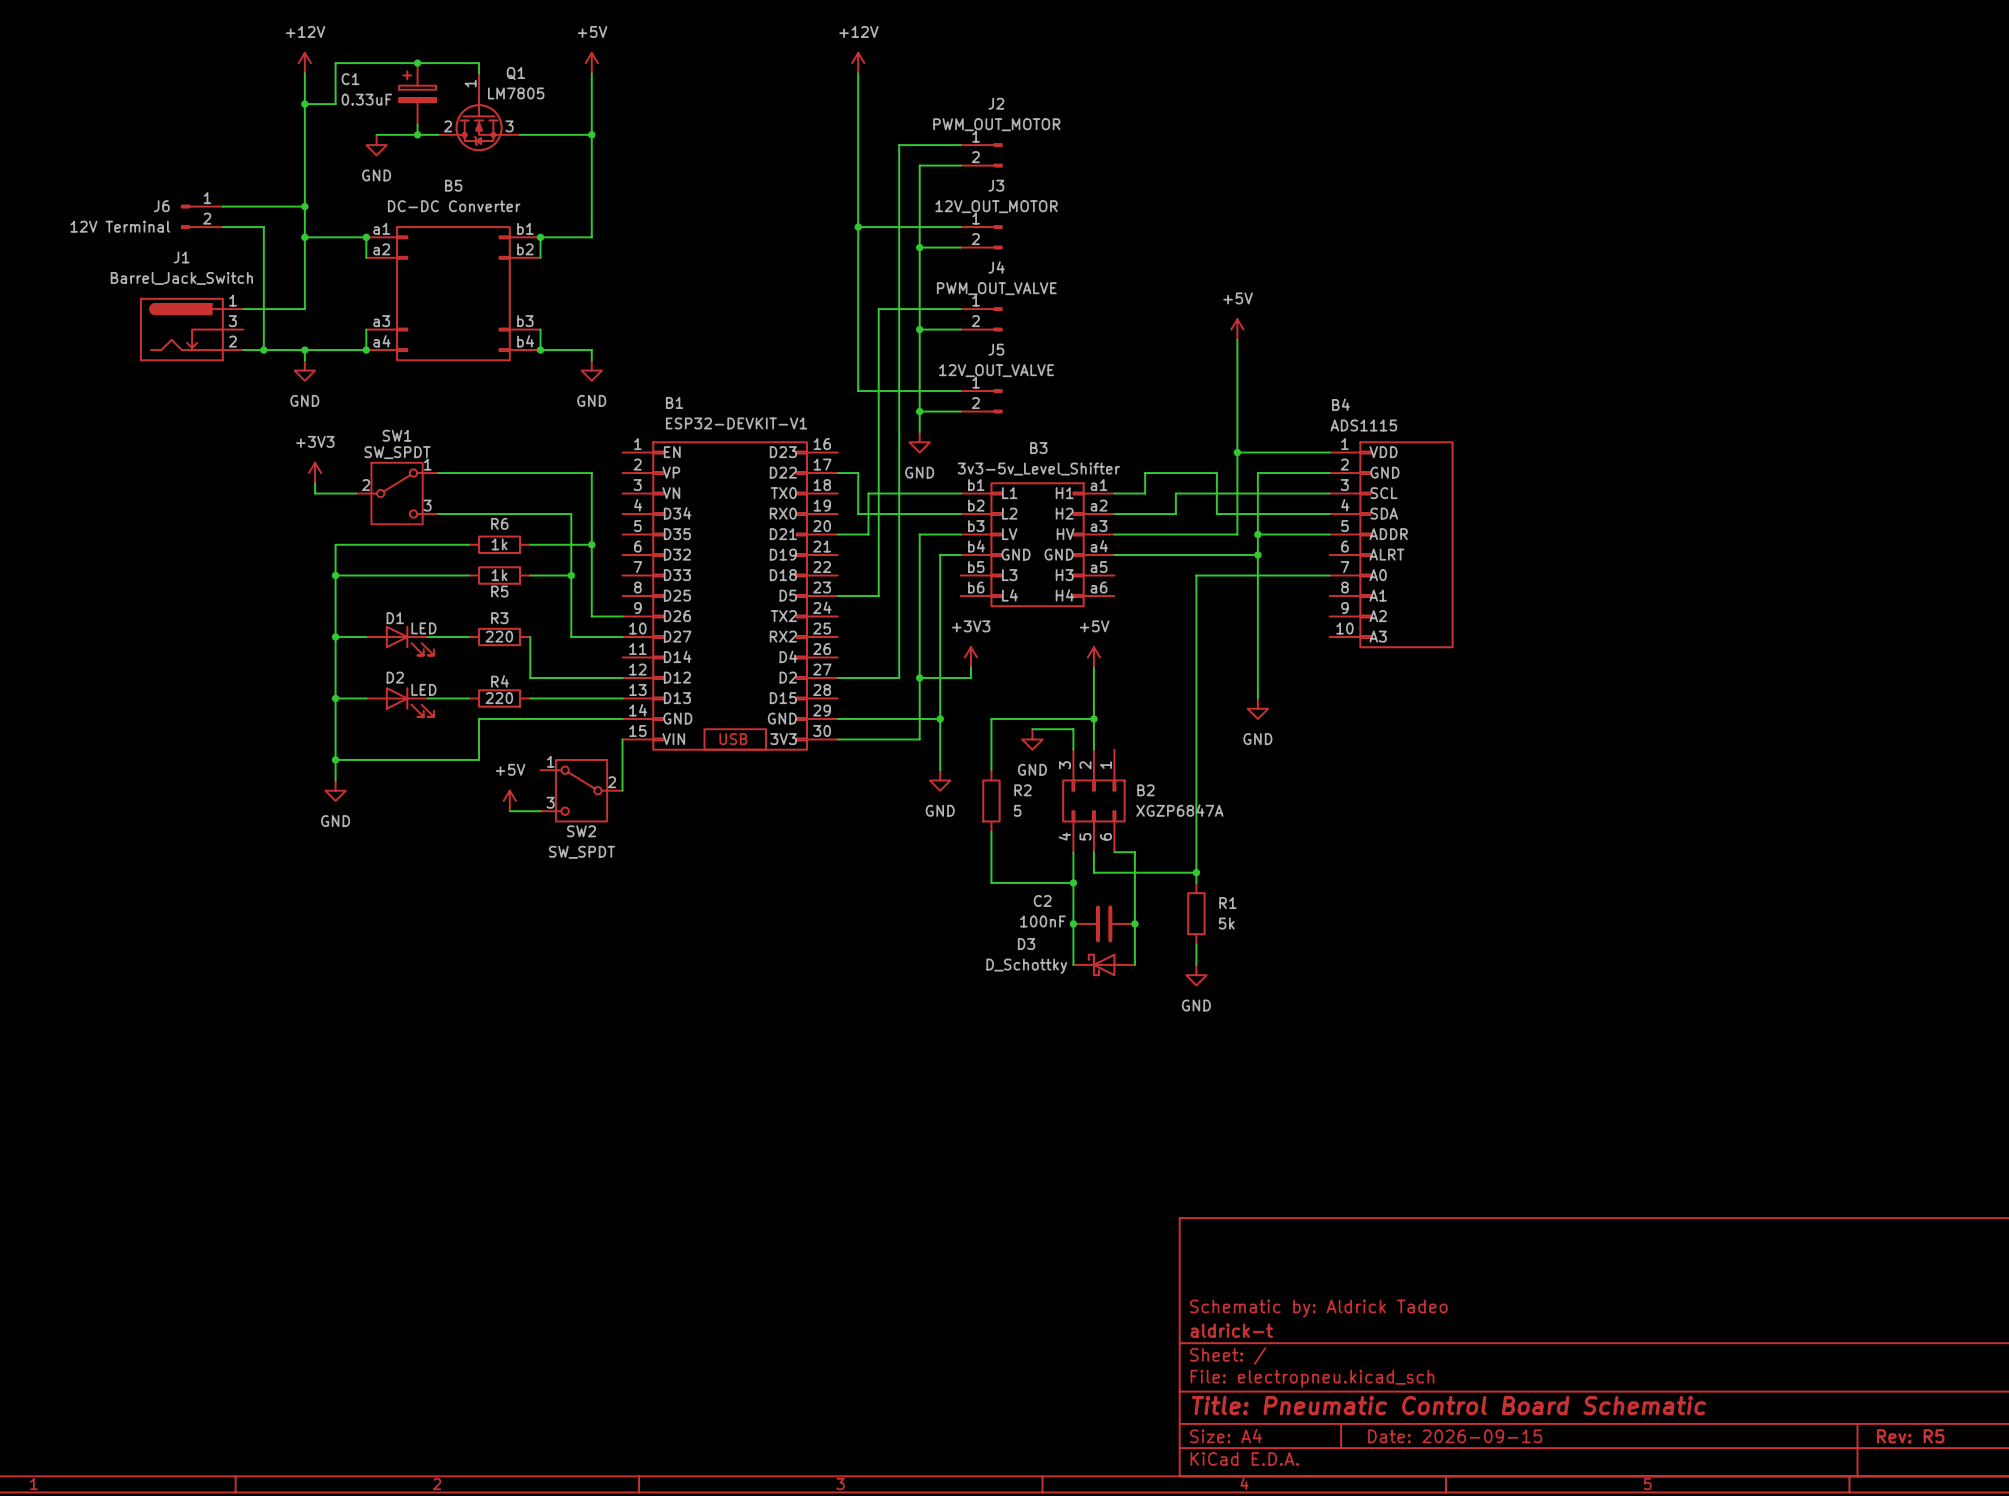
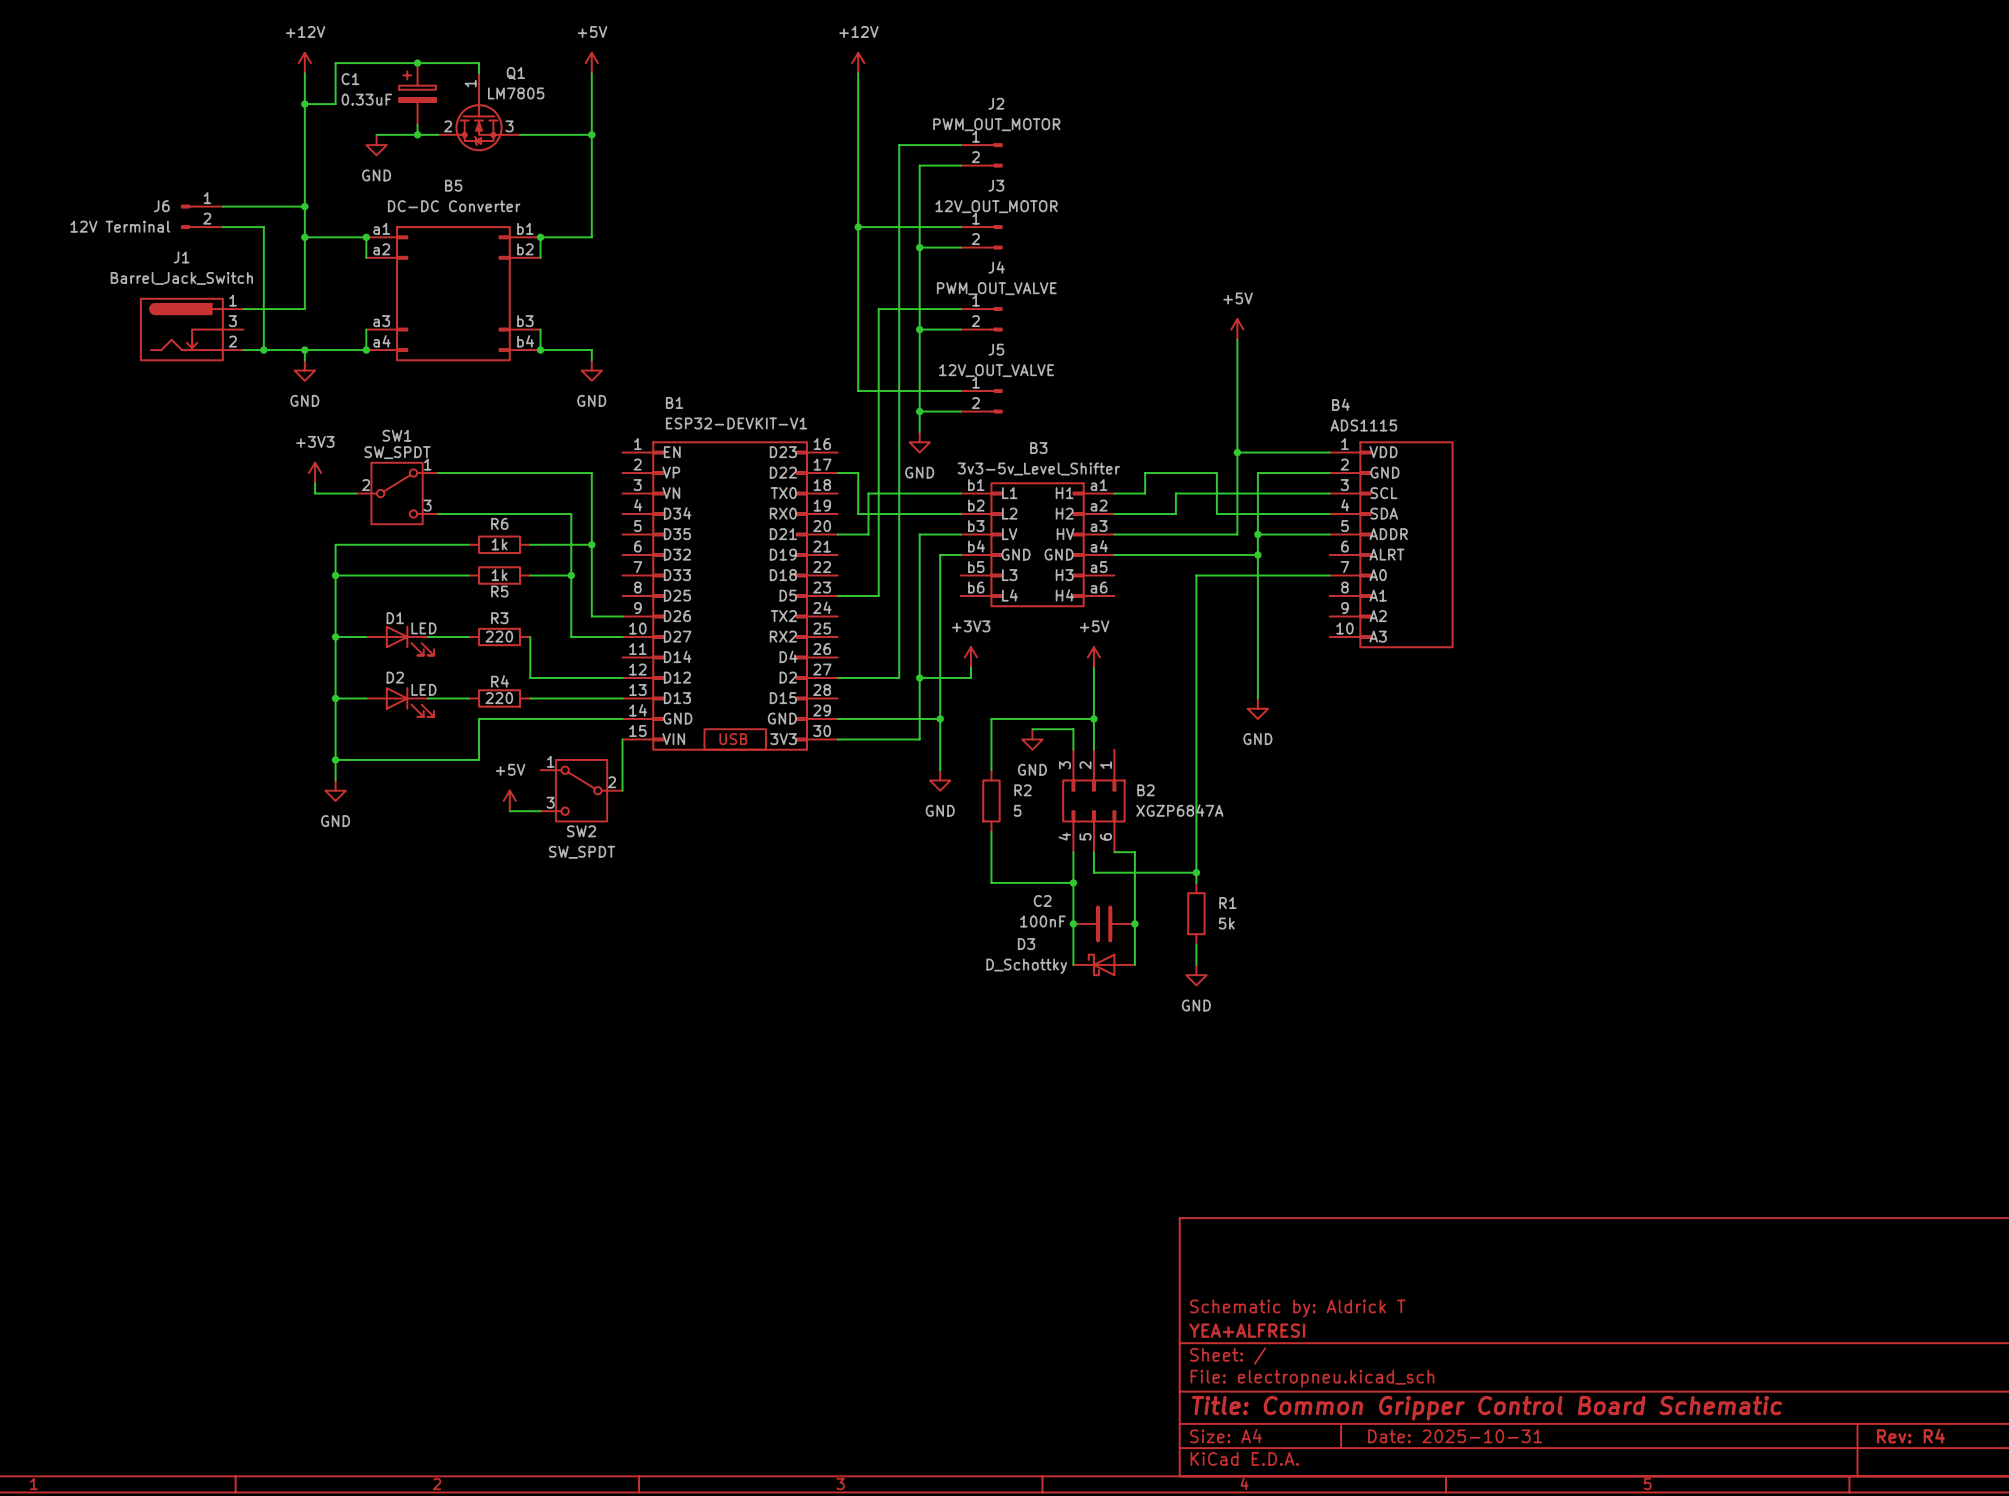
title block: Schematic by: Aldrick Tadeo (1318, 1308) -> Schematic by: Aldrick T (1297, 1308)
title block: aldrick-t (1231, 1330) -> YEA+ALFRESI (1247, 1330)
title block: Title: Pneumatic Control Board Schematic (1448, 1405) -> Title: Common Gripper Control Board Schematic (1487, 1408)
title block: Date: 2026-09-15 (1455, 1436) -> Date: 2025-10-31 (1455, 1436)
title block: Rev: R5 (1910, 1436) -> Rev: R4 (1910, 1436)

